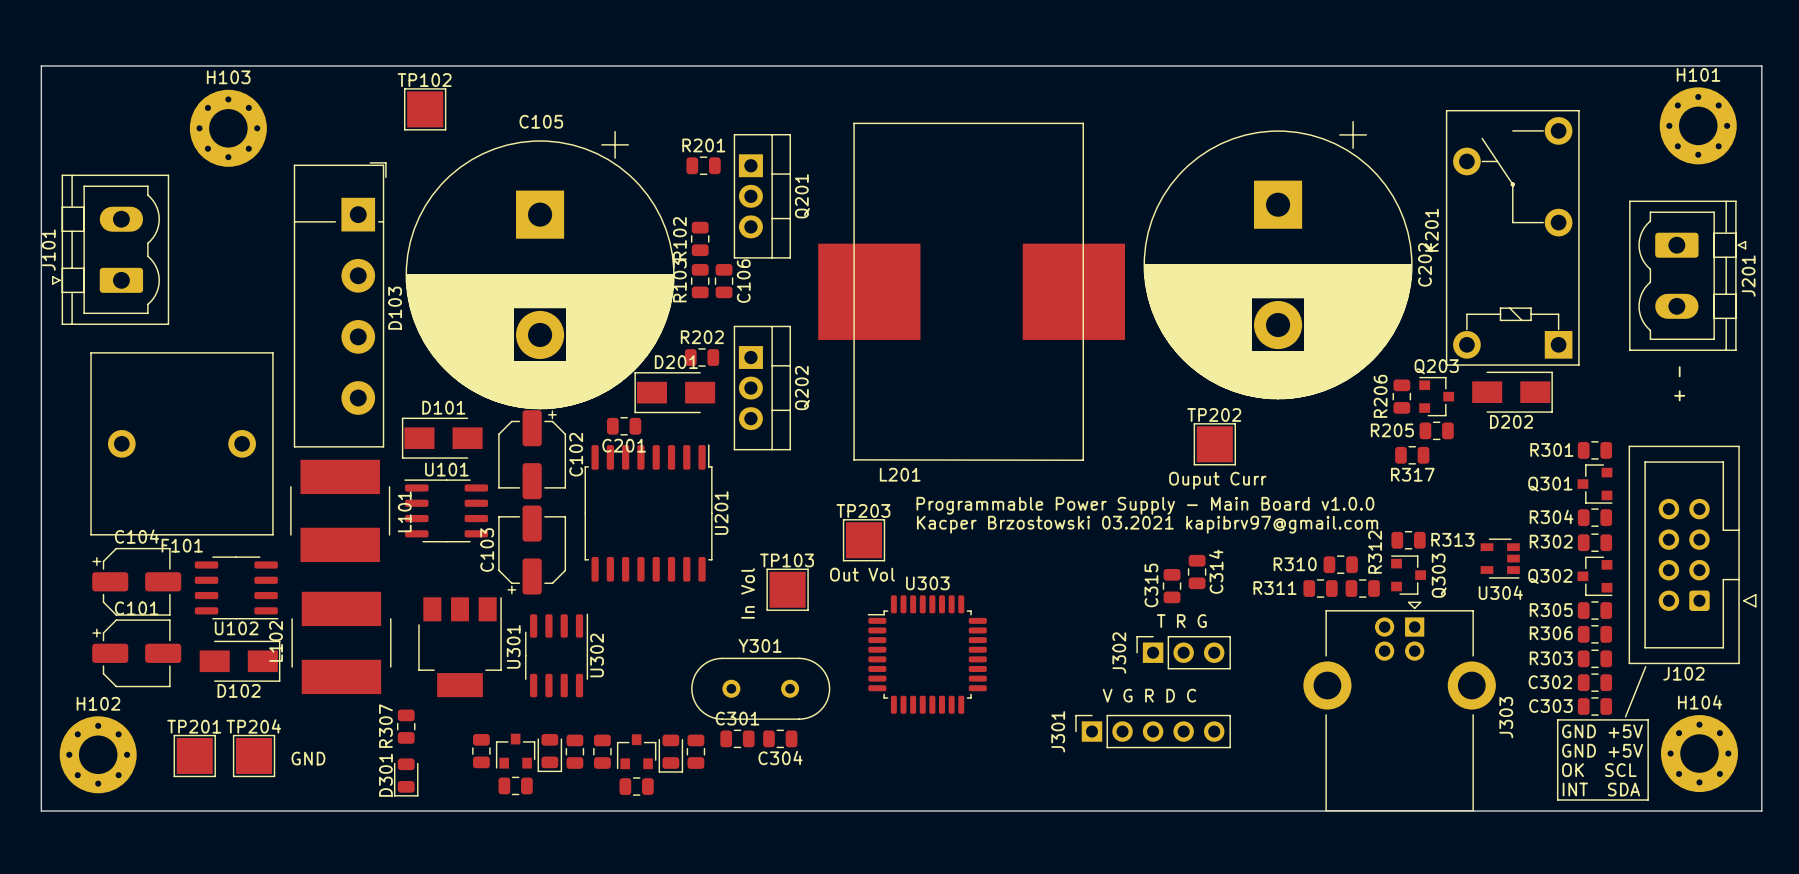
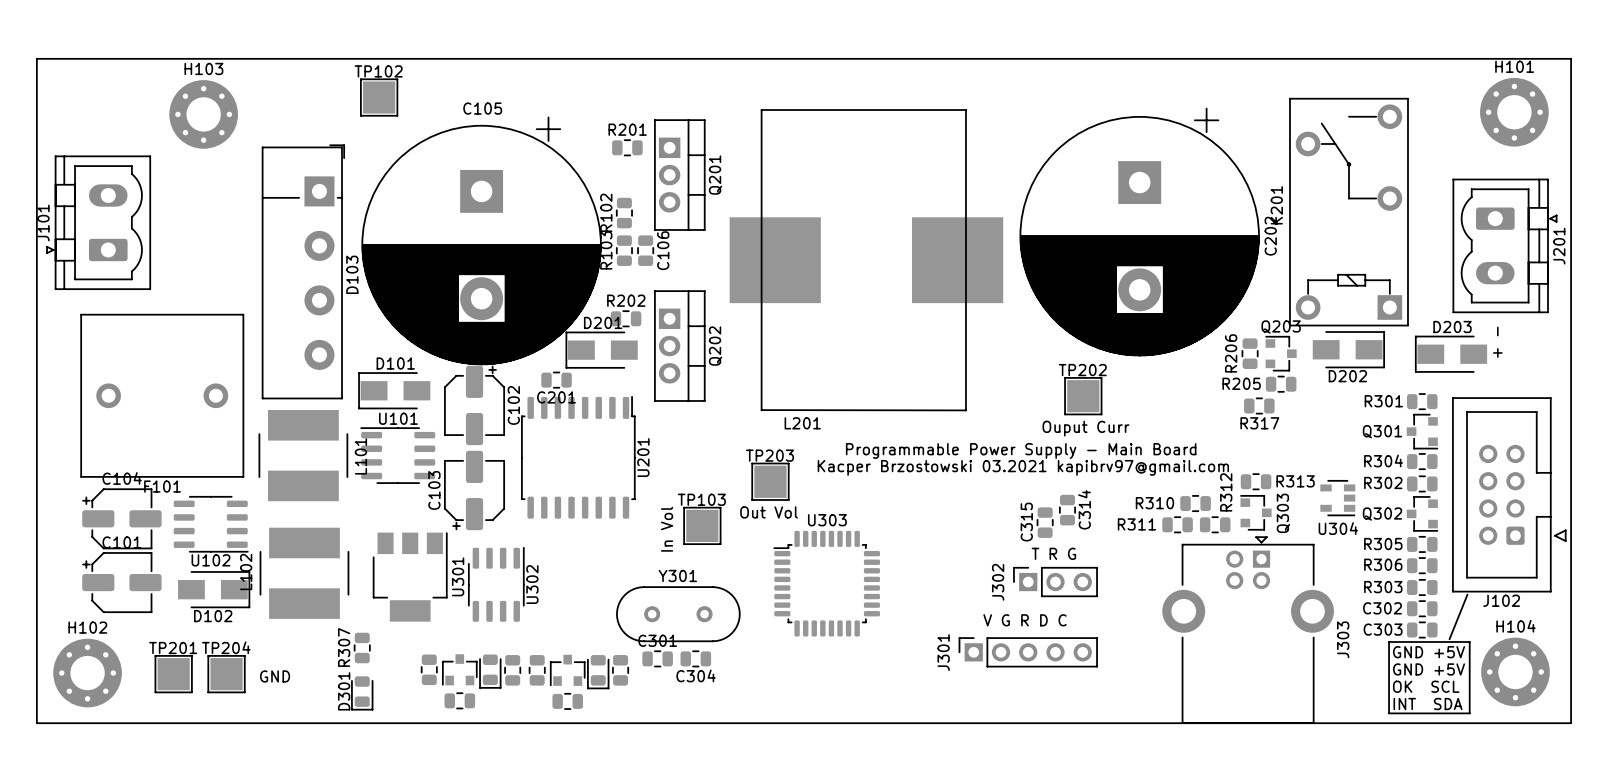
D203: none -> (1451, 354)
text: Programmable Power Supply - Main Board v1.0.0 (1145, 505) -> Programmable Power Supply - Main Board (1021, 450)

